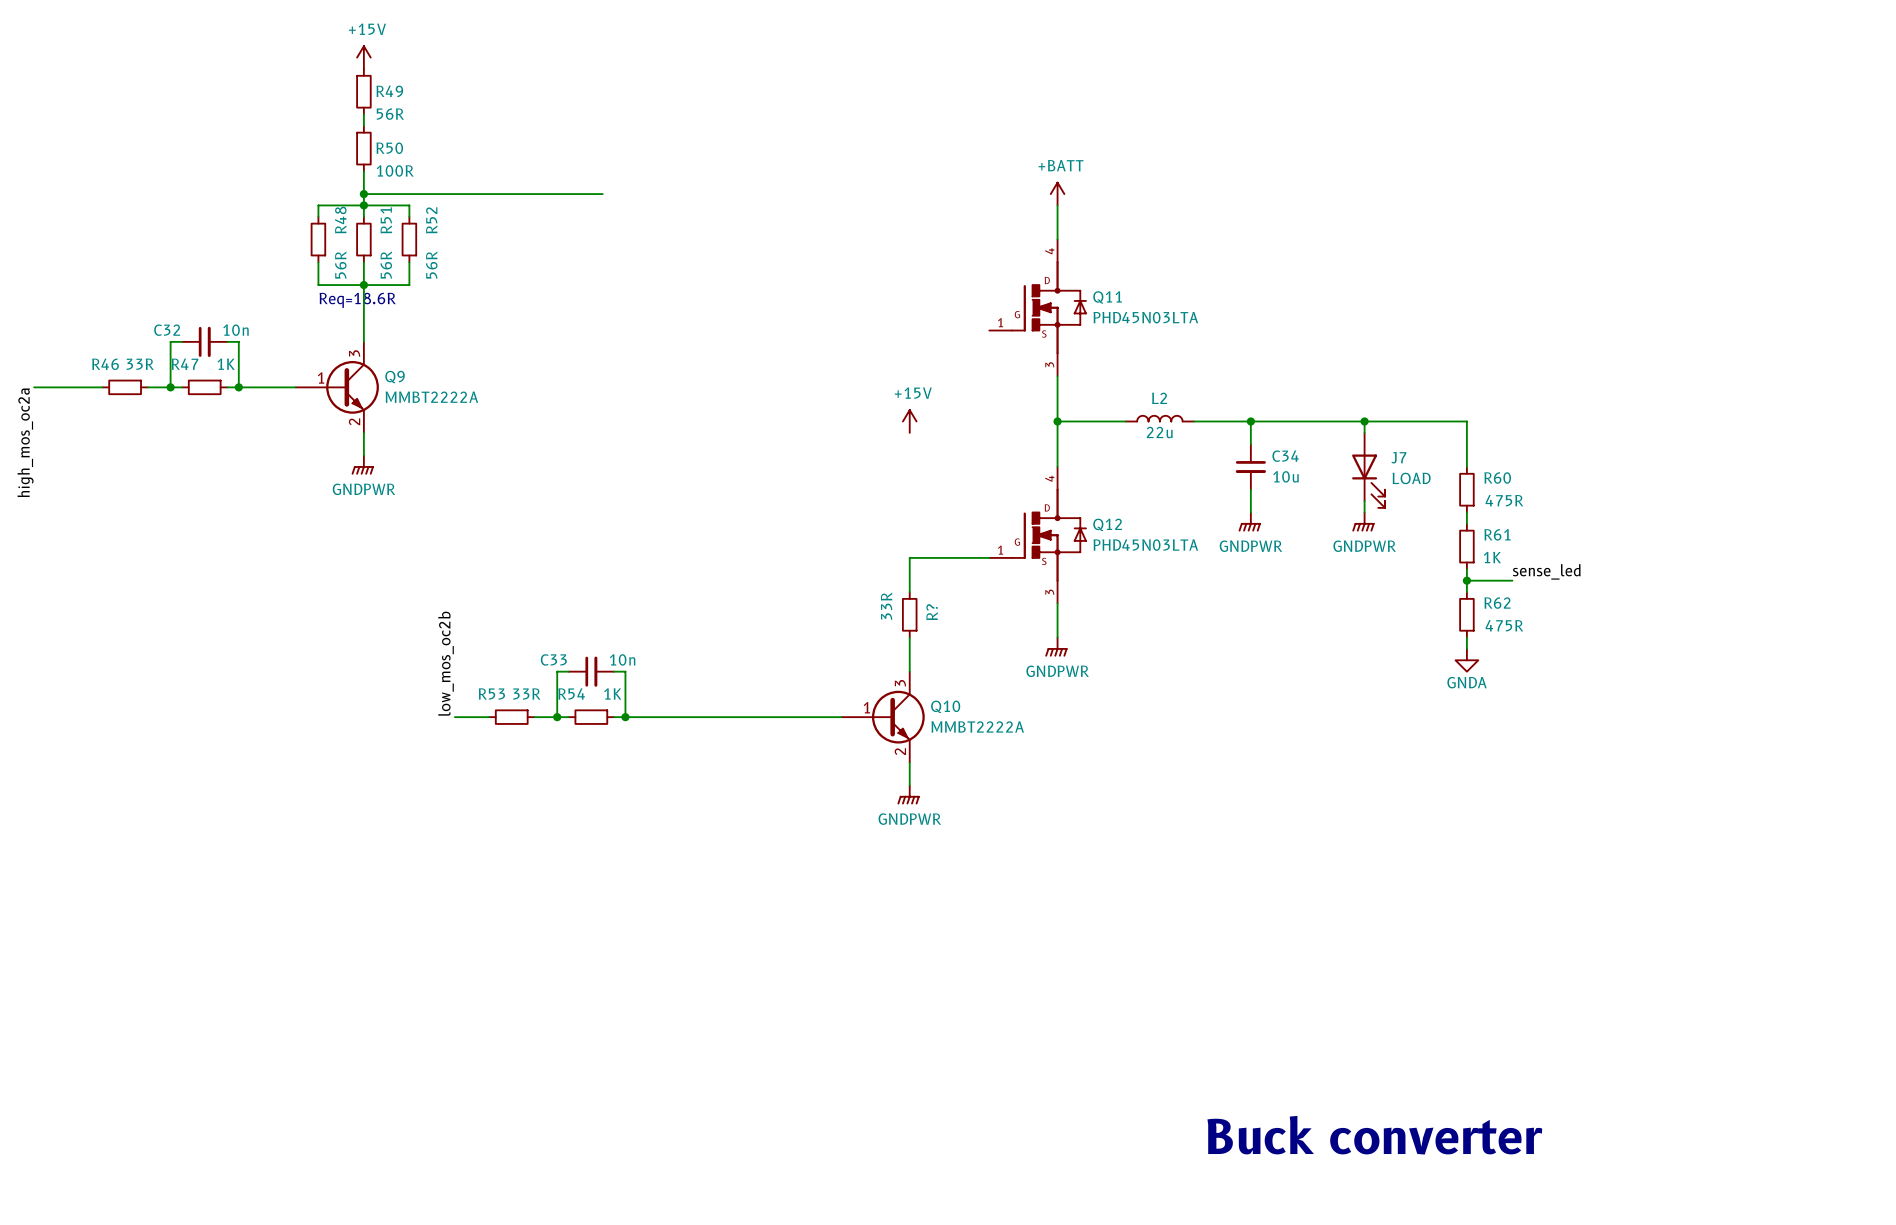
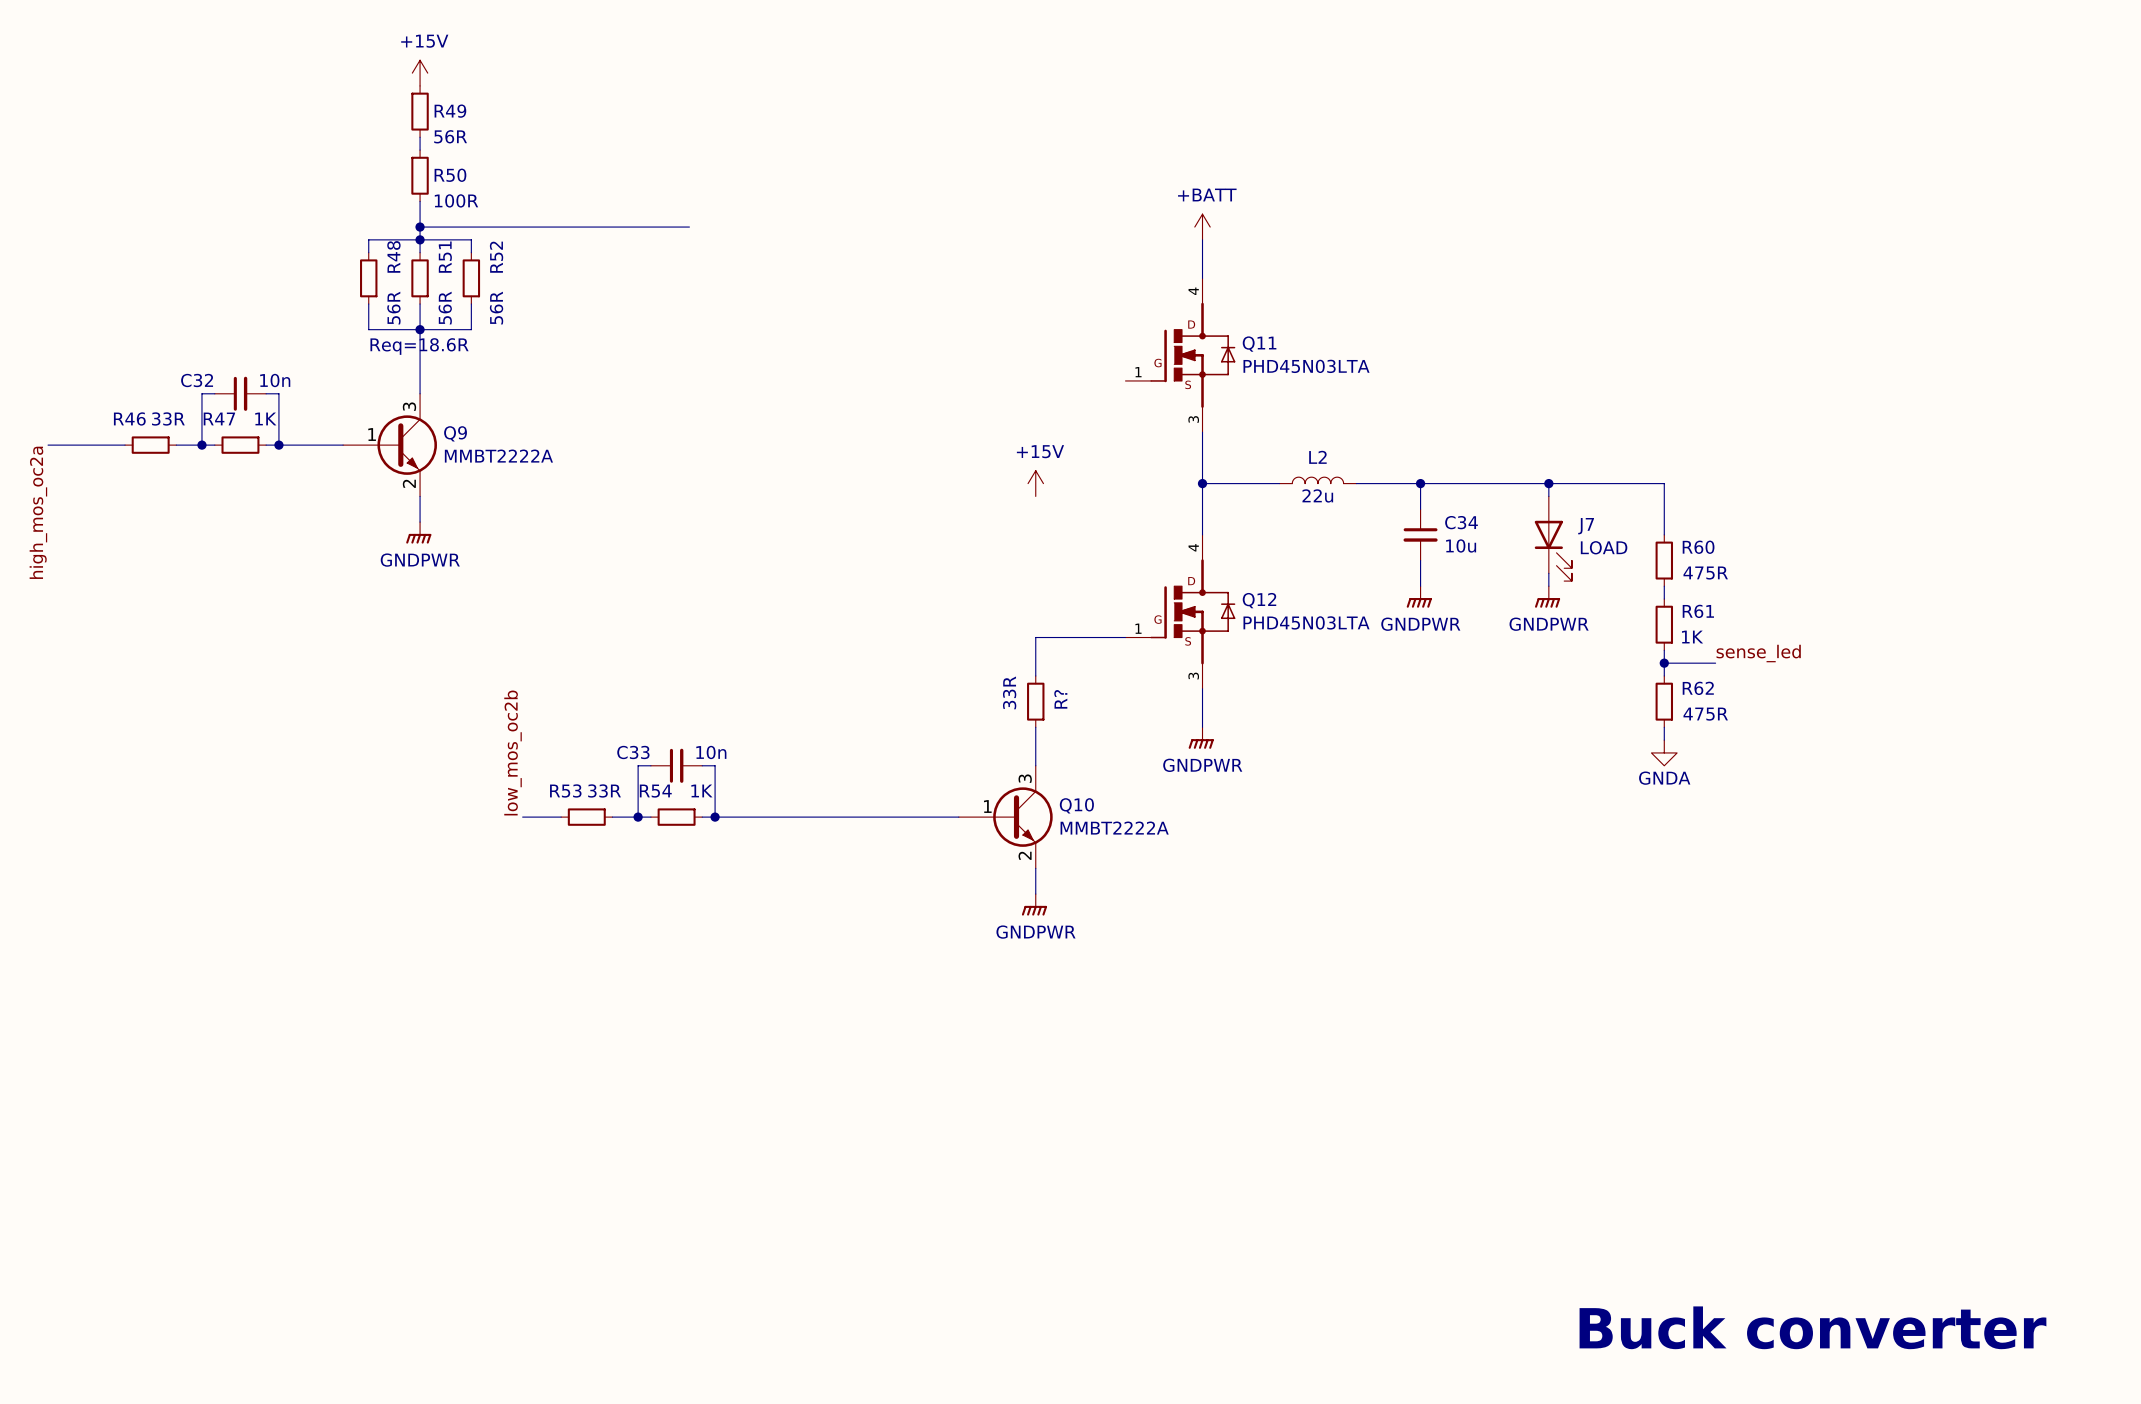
text position: Buck converter (1374, 1135) -> Buck converter (1812, 1327)

